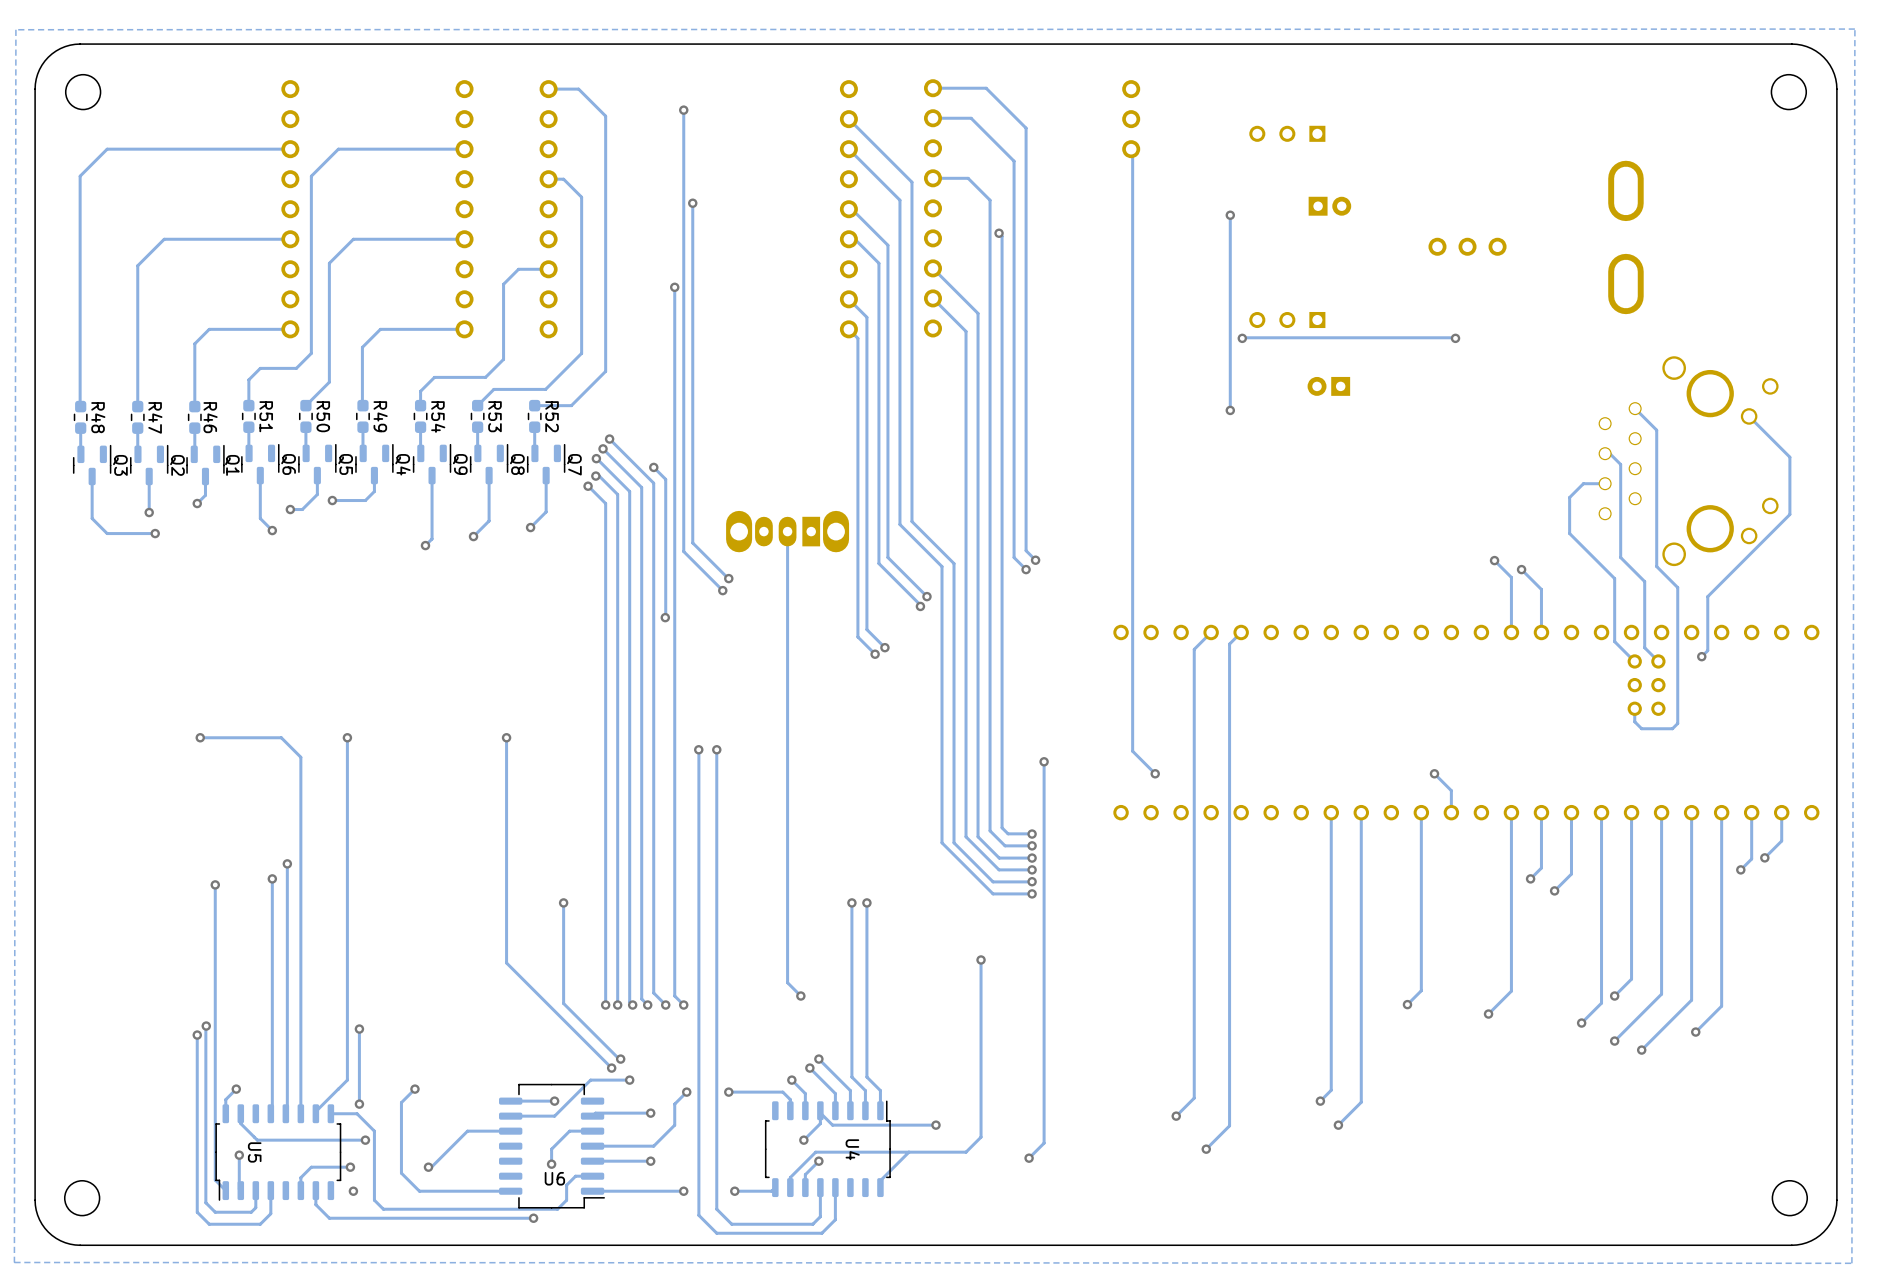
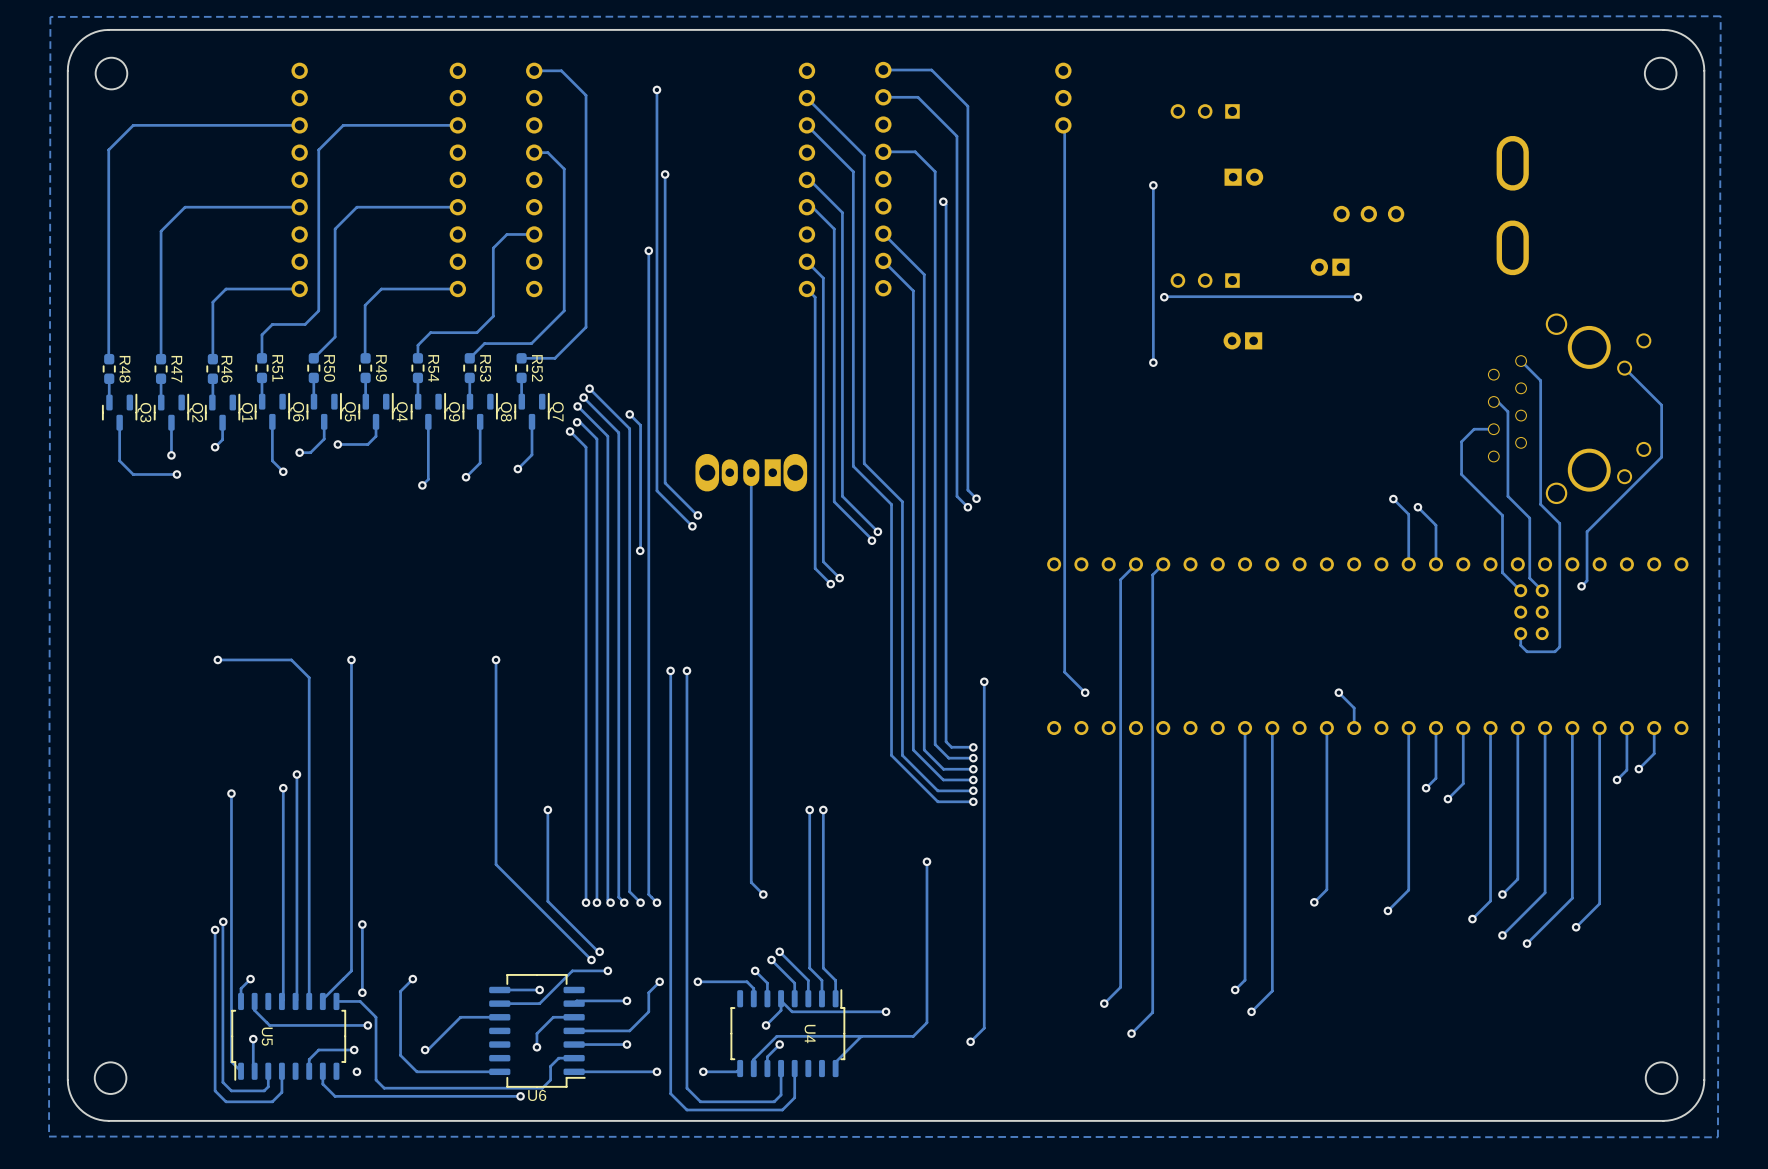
part: none -> (1330, 267)
U6 name position: U6 (554, 1178) -> U6 (537, 1095)

